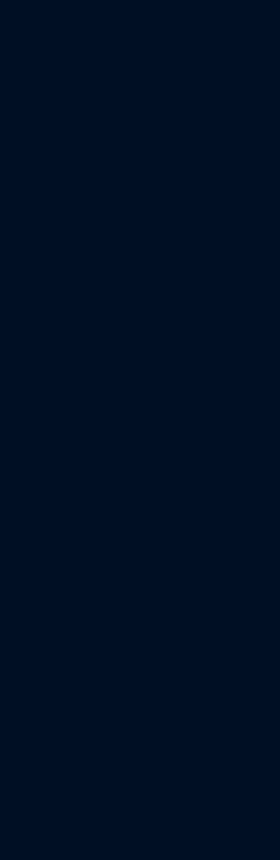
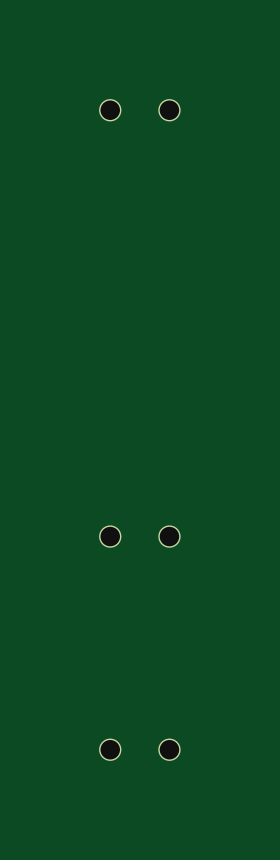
part: none -> (139, 110)
part: none -> (139, 536)
part: none -> (139, 749)

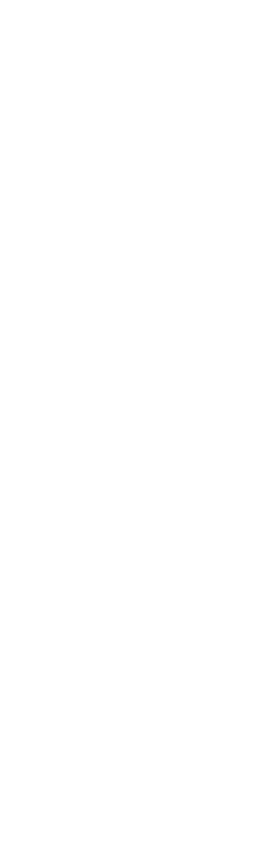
part: (139, 110) -> none
part: (139, 536) -> none
part: (139, 749) -> none

